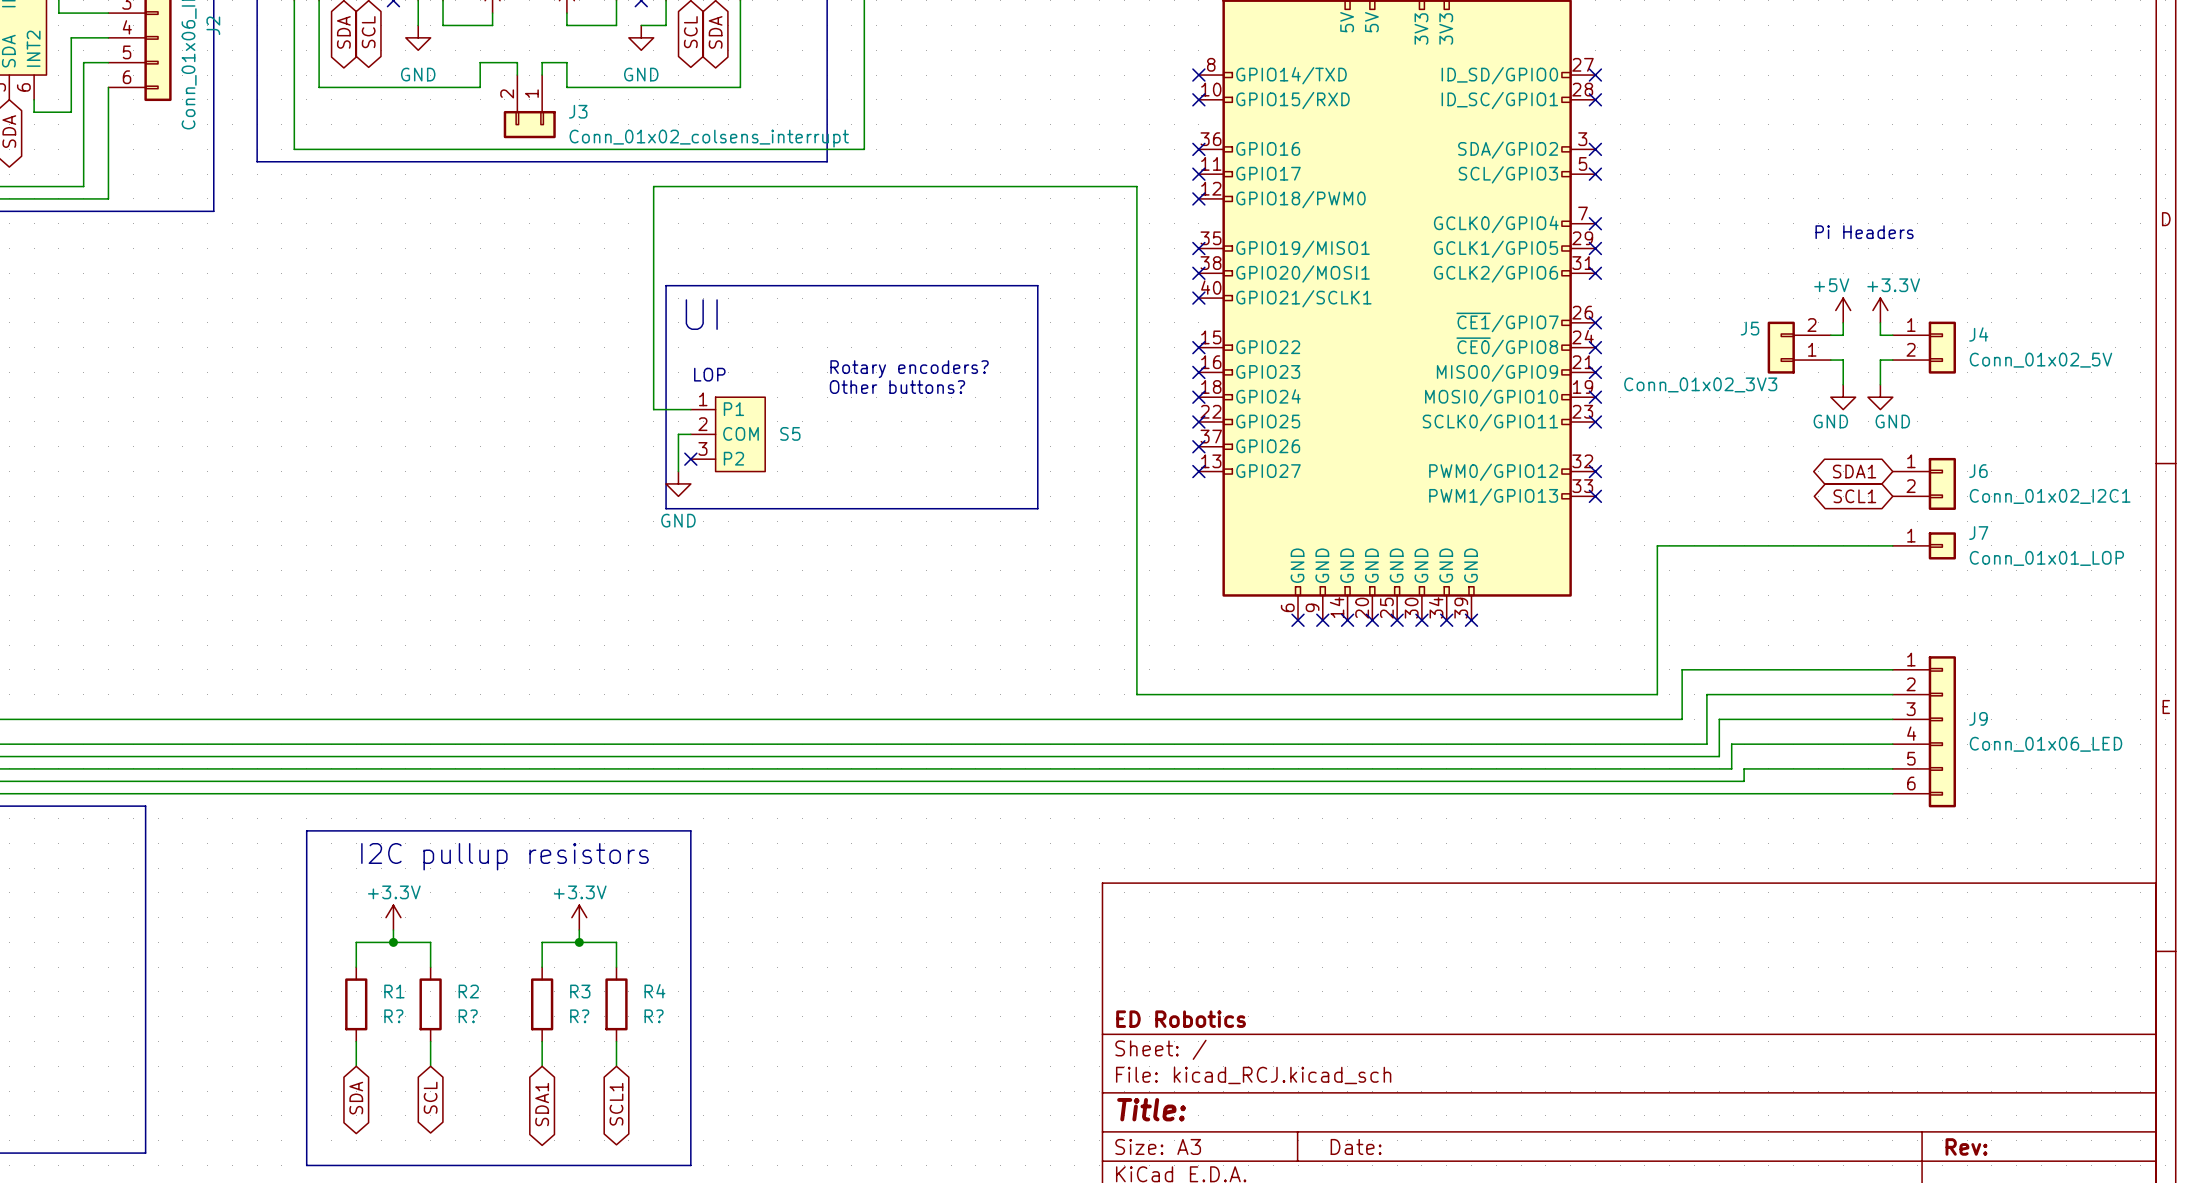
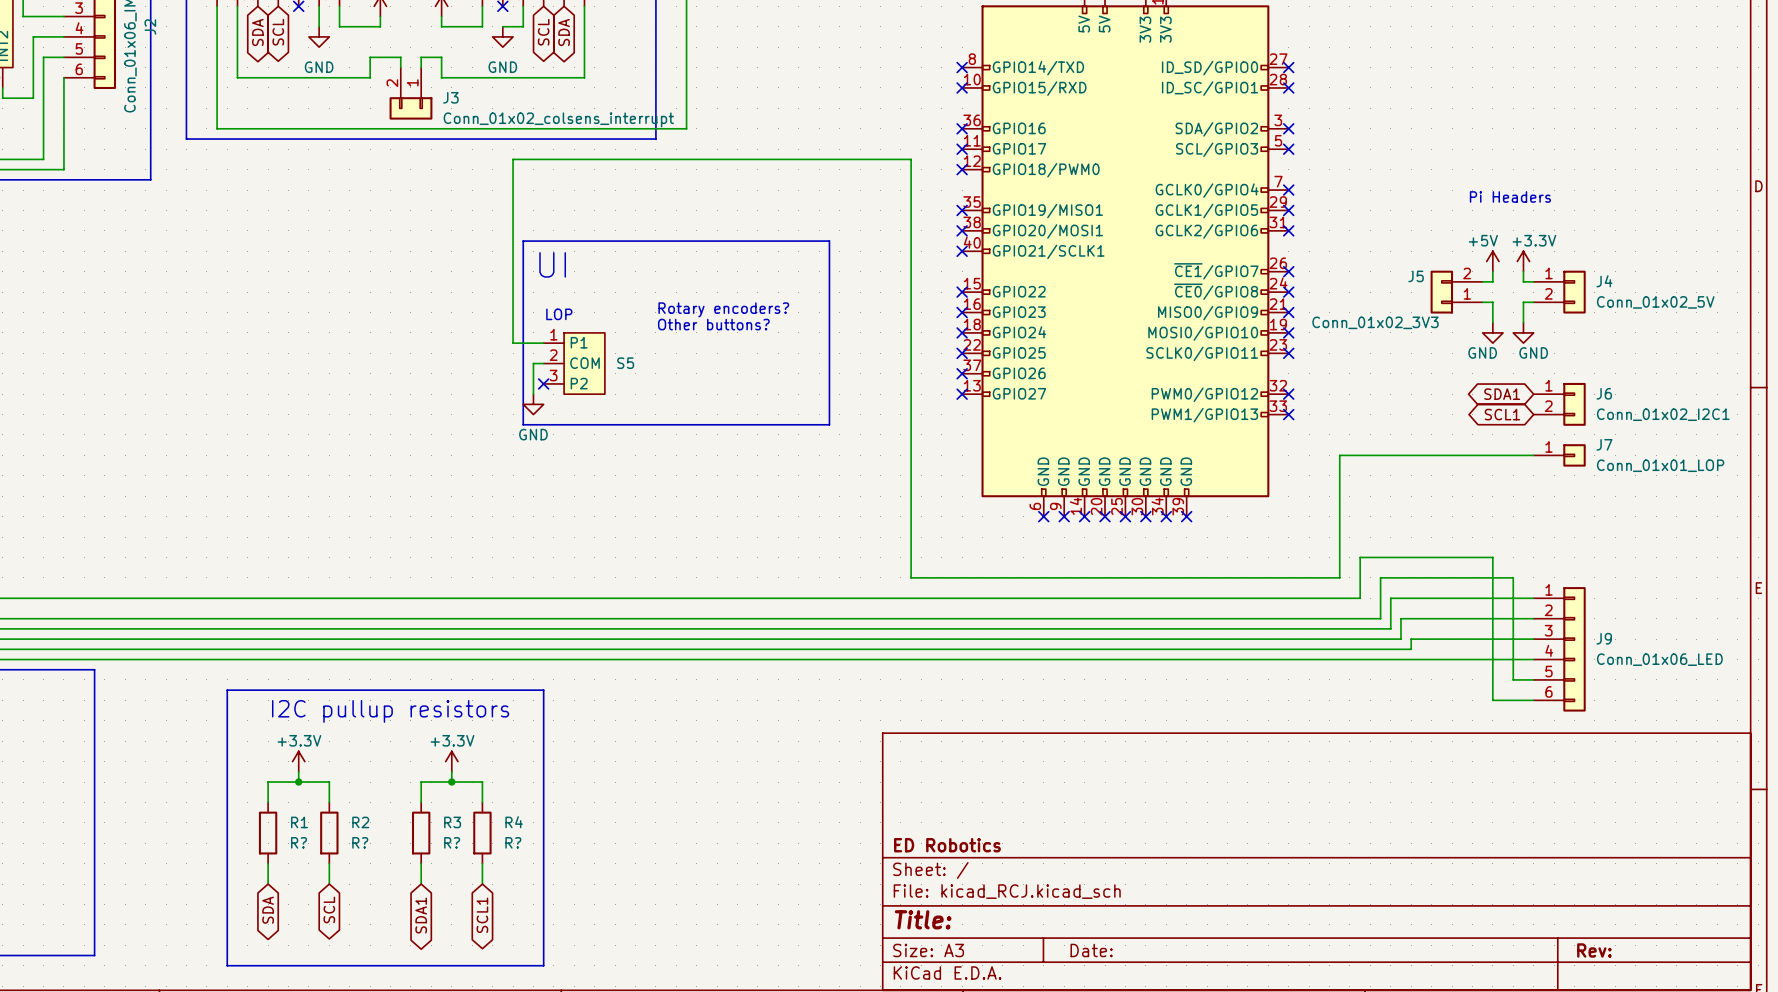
wire: (1843, 669) (1892, 669) -> (1492, 557) (1492, 700) (1533, 700)
wire: (1868, 694) (1892, 694) -> (1513, 577) (1513, 679) (1533, 679)
J9 position: (1924, 731) -> (1559, 649)

